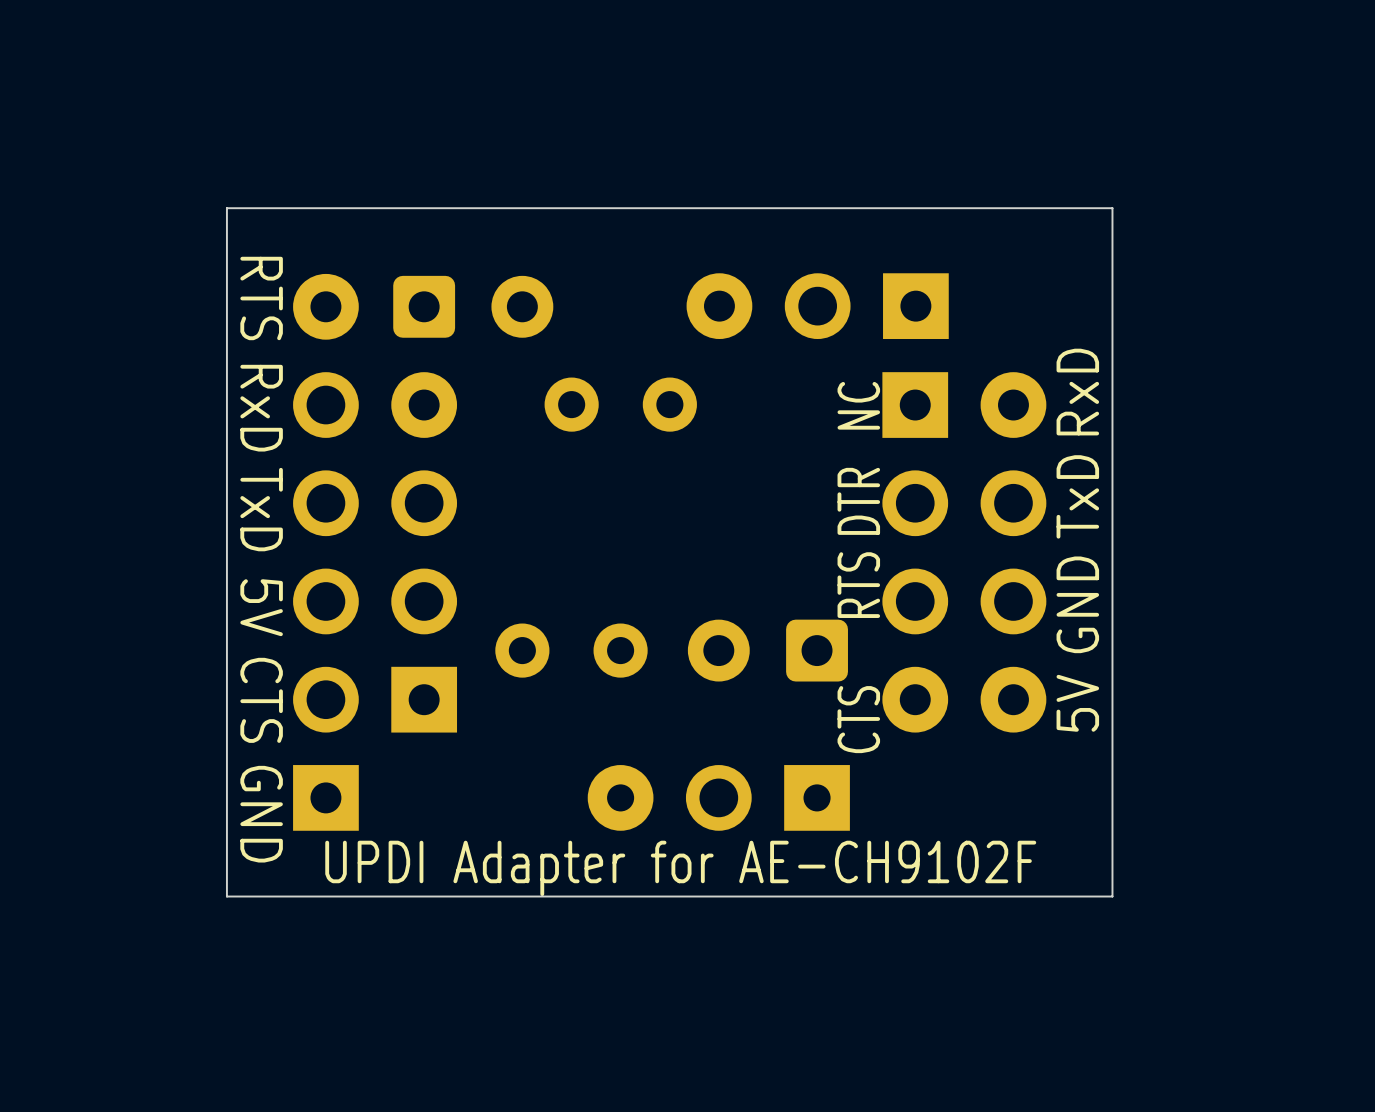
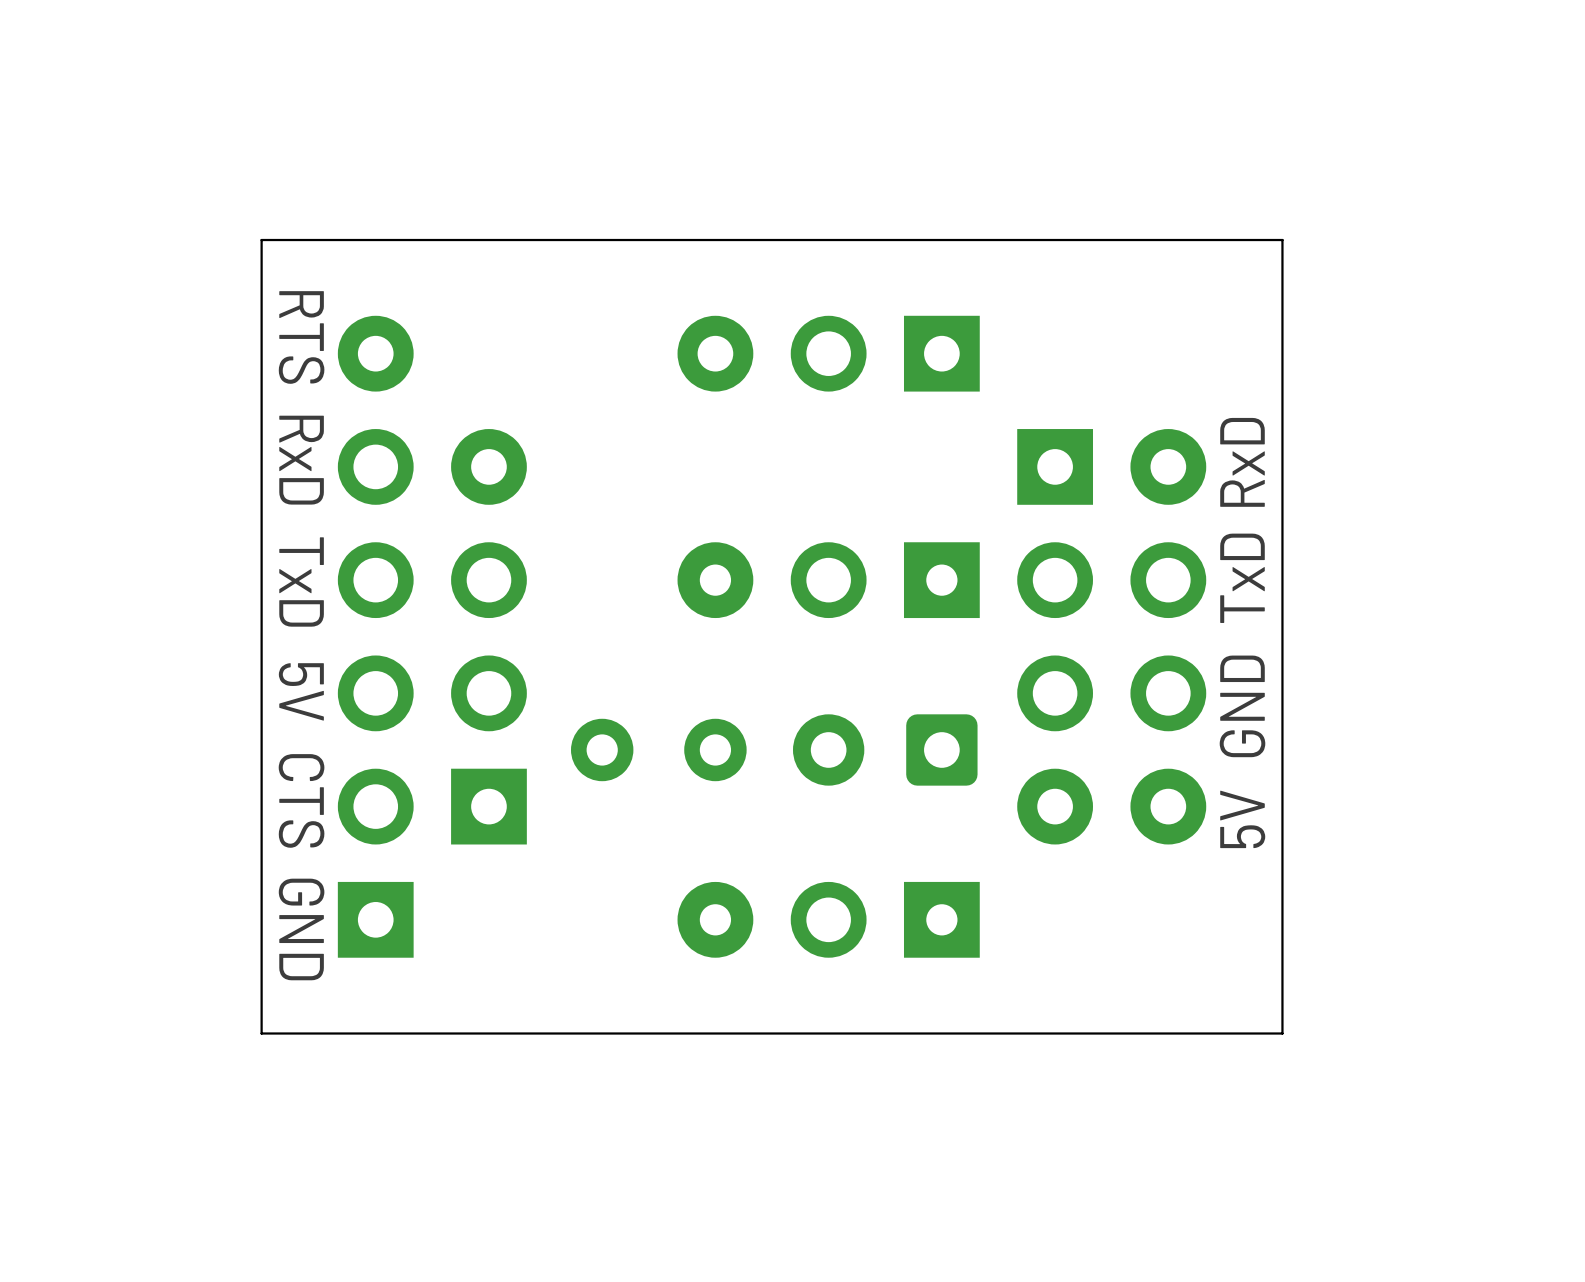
part: (473, 306) -> none
part position: (817, 306) -> (828, 353)
part: (620, 404) -> none
text: NC (858, 405) -> none
text: DTR (858, 501) -> none
part: none -> (828, 580)
text: RTS (858, 585) -> none
text: CTS (858, 719) -> none
text: UPDI Adapter for AE-CH9102F (680, 868) -> none

